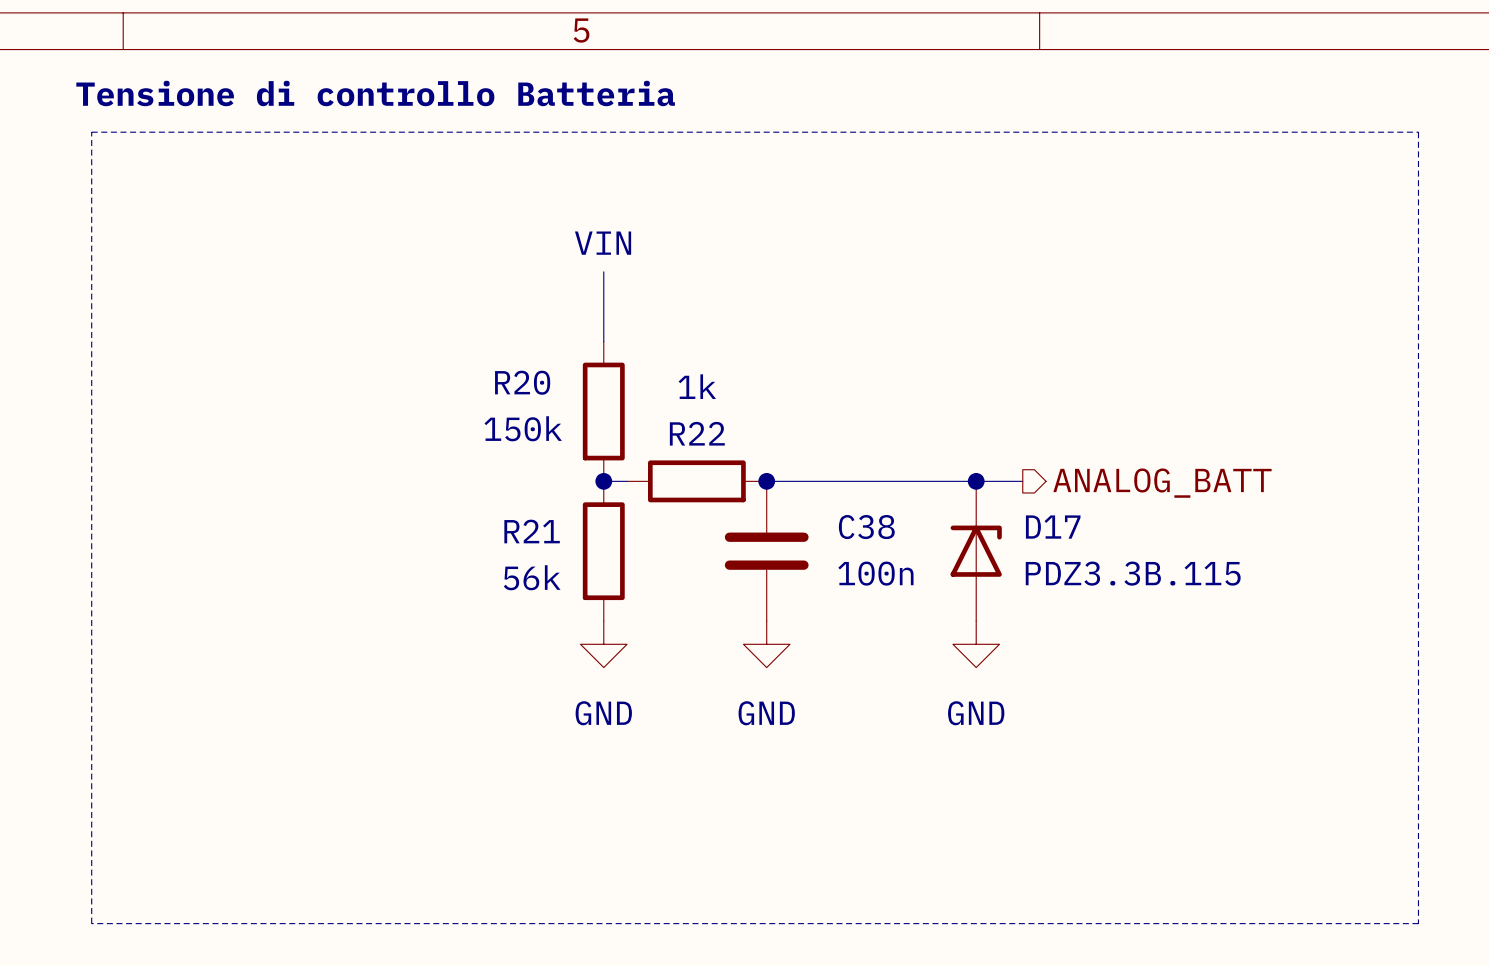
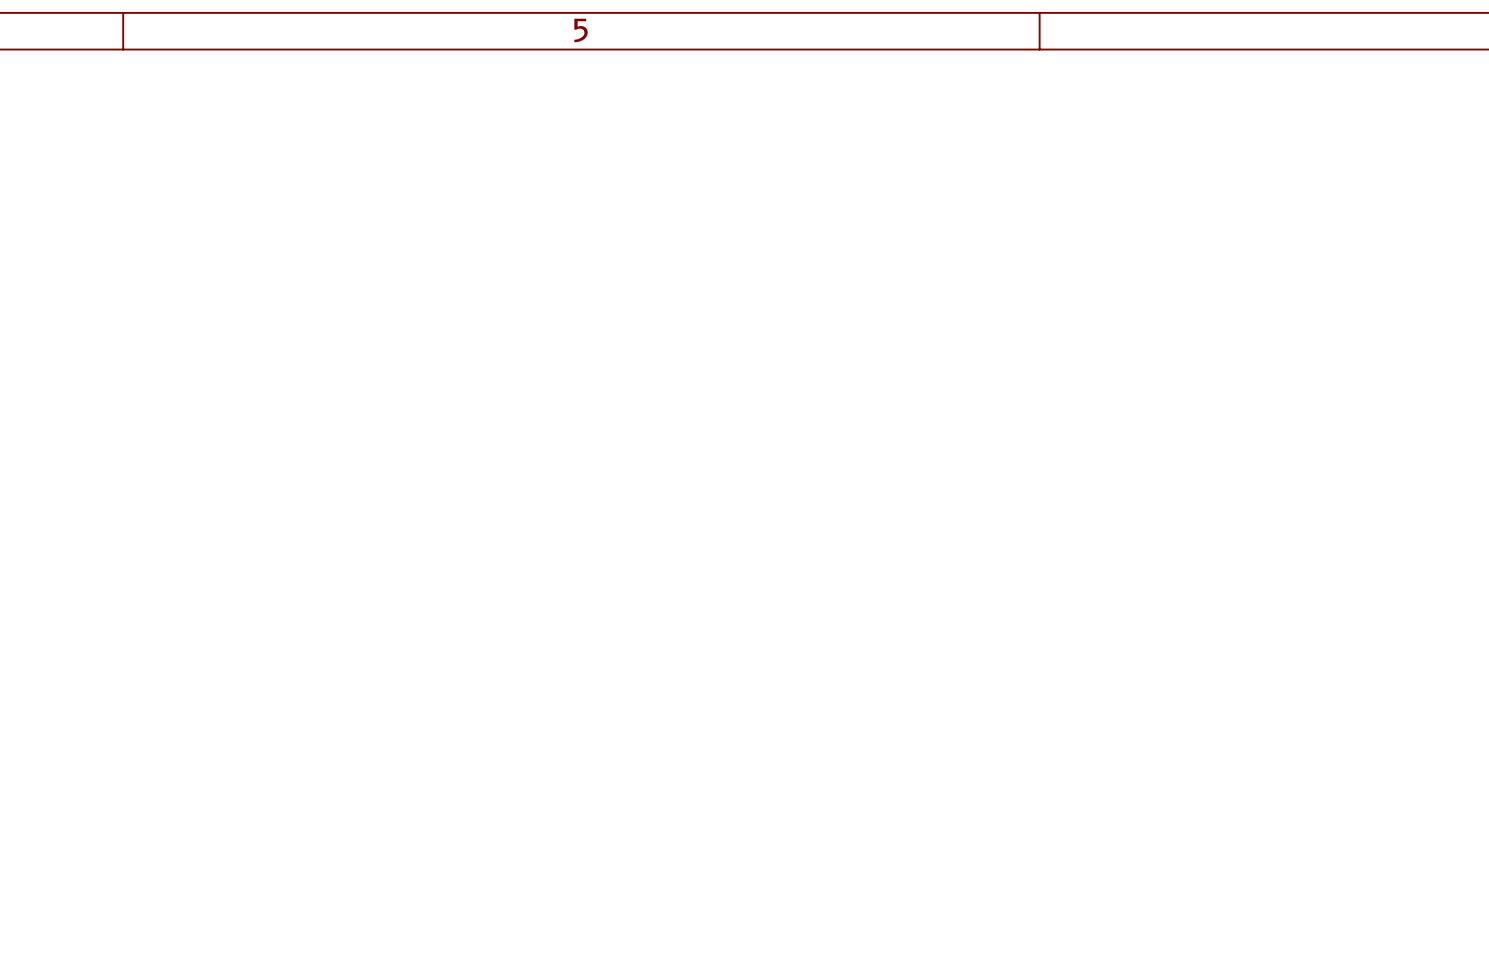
text: Tensione di controllo Batteria (375, 93) -> none
line: (91, 132) (1418, 132) (1418, 923) (91, 923) (91, 132) -> none
text: VIN (603, 243) -> none
wire: (603, 271) (603, 341) -> none
R20: 150k (603, 411) -> none
wire: (603, 481) (627, 481) -> none
junction: (603, 481) -> none
R22: 1k (696, 481) -> none
wire: (766, 481) (1022, 481) -> none
junction: (766, 481) -> none
junction: (976, 481) -> none
hierarchical label: ANALOG_BATT (1162, 483) -> none
R21: 56k (603, 551) -> none
C38: 100n (766, 551) -> none
D17: PDZ3.3B.115 (976, 551) -> none
power symbol: GND (603, 644) -> none
power symbol: GND (766, 644) -> none
power symbol: GND (976, 644) -> none

